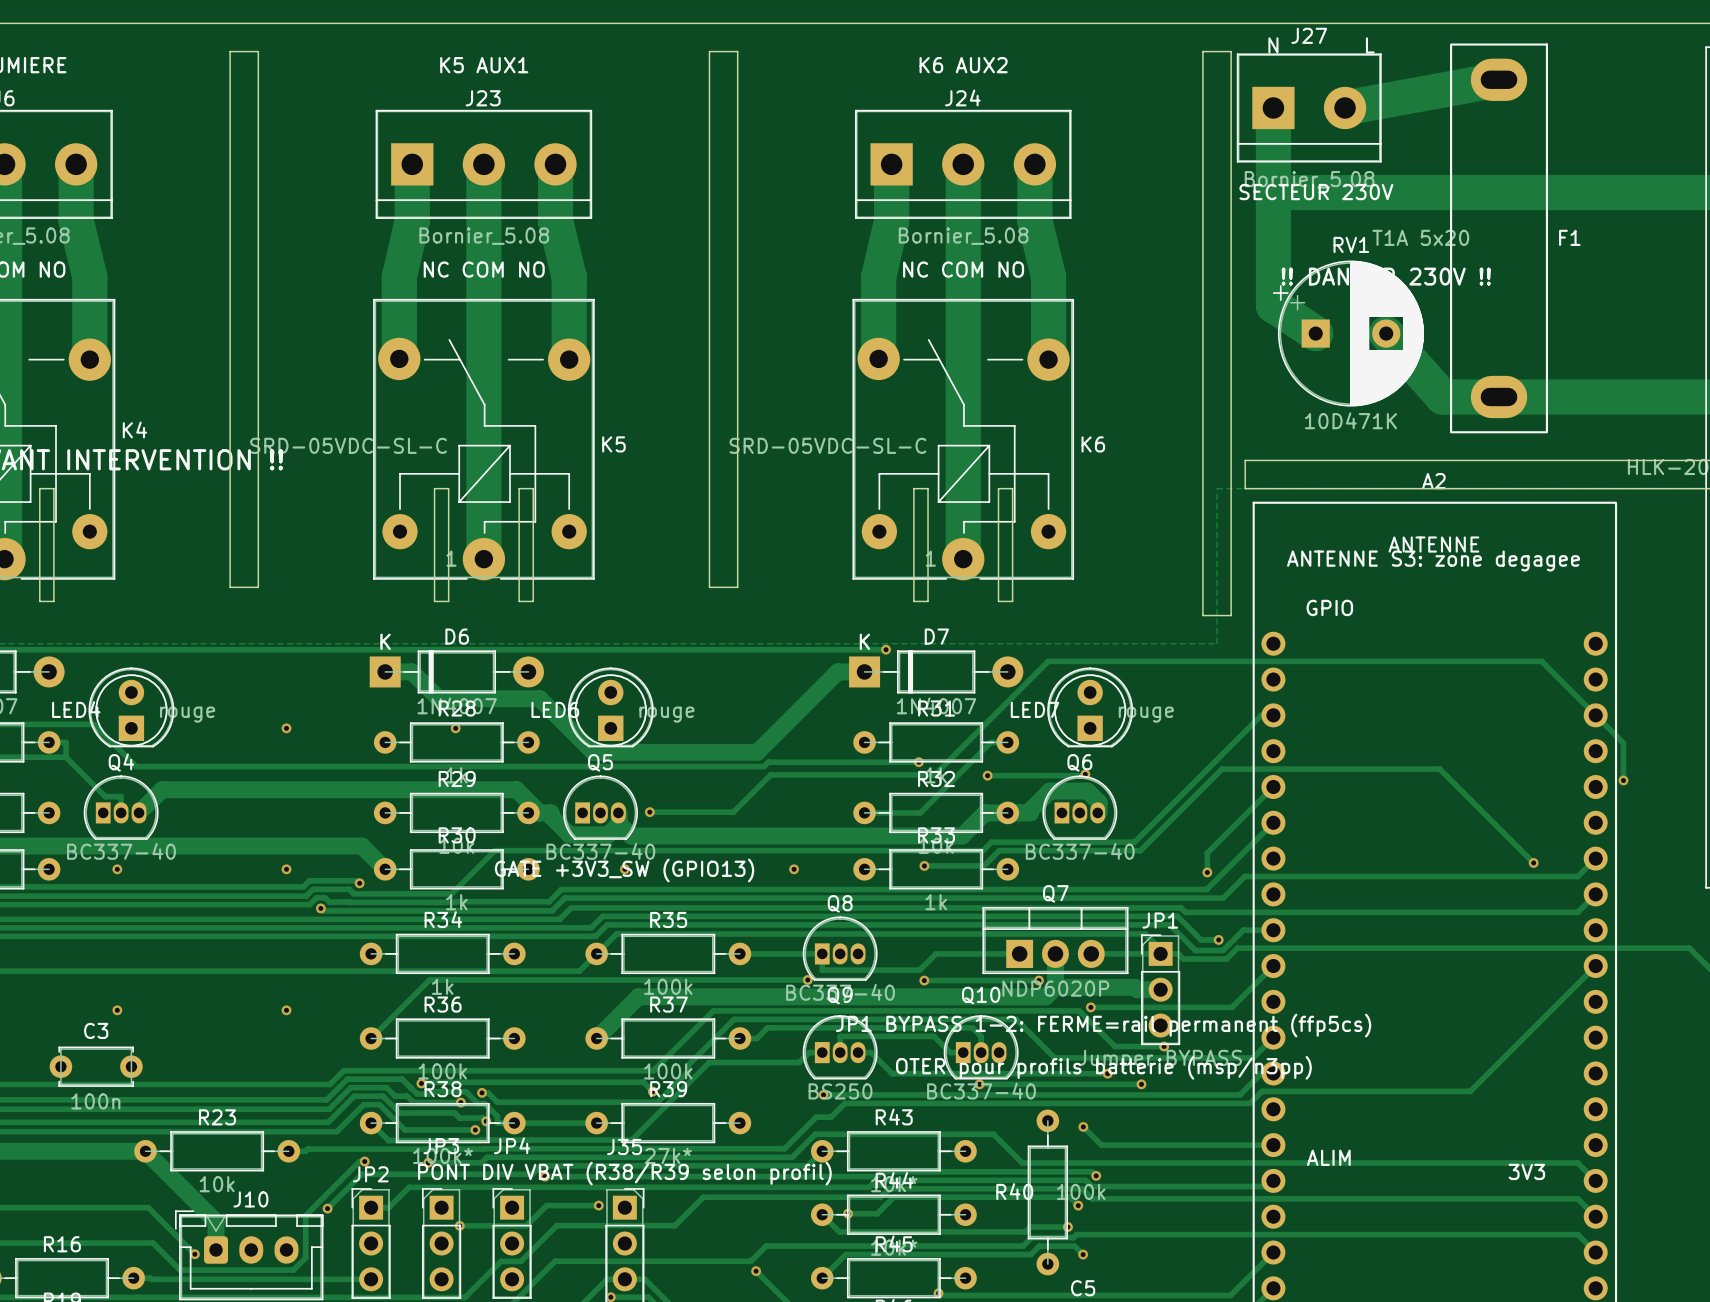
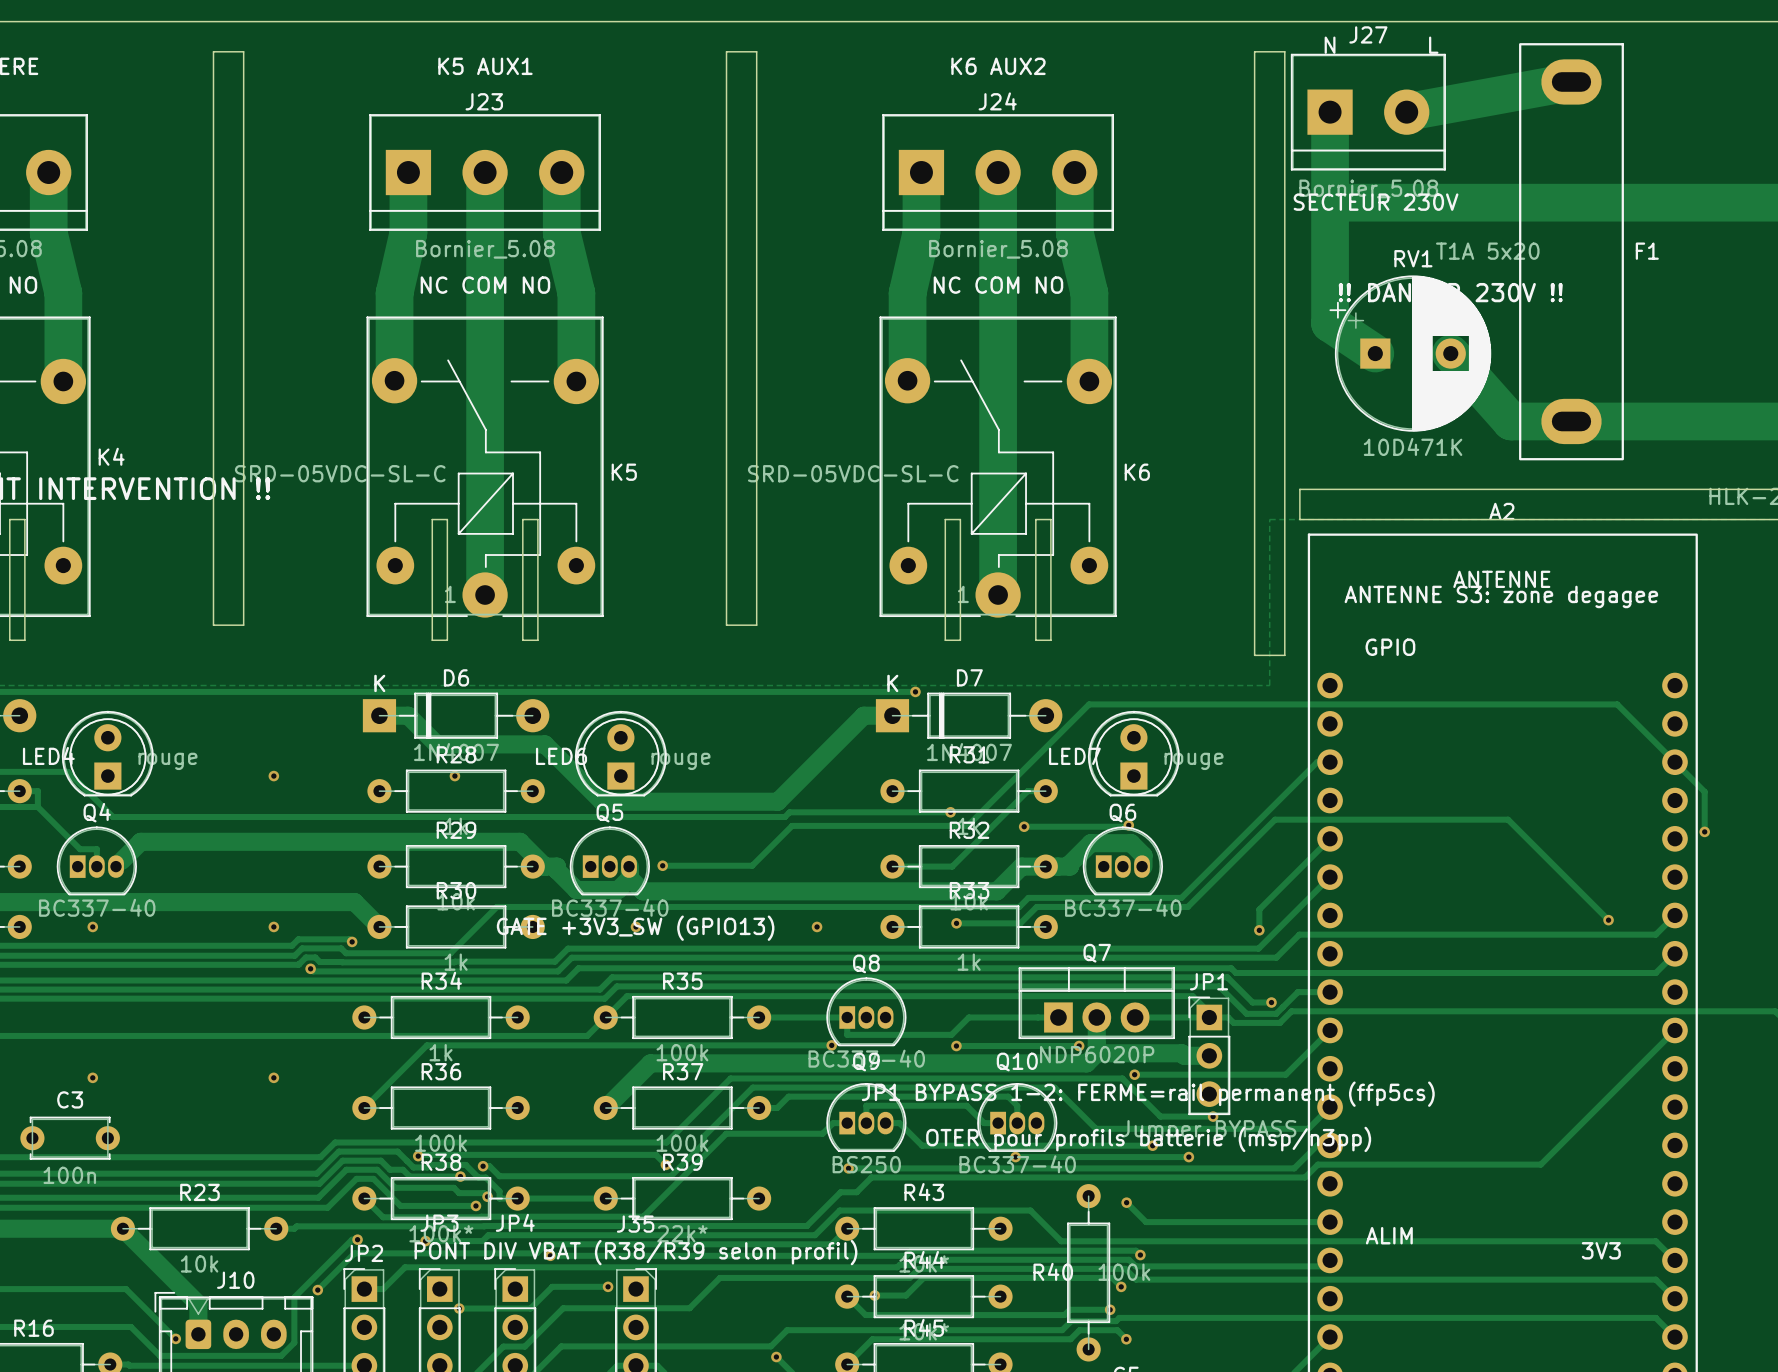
R39 value: 27k* (668, 1155) -> 22k* (682, 1233)

